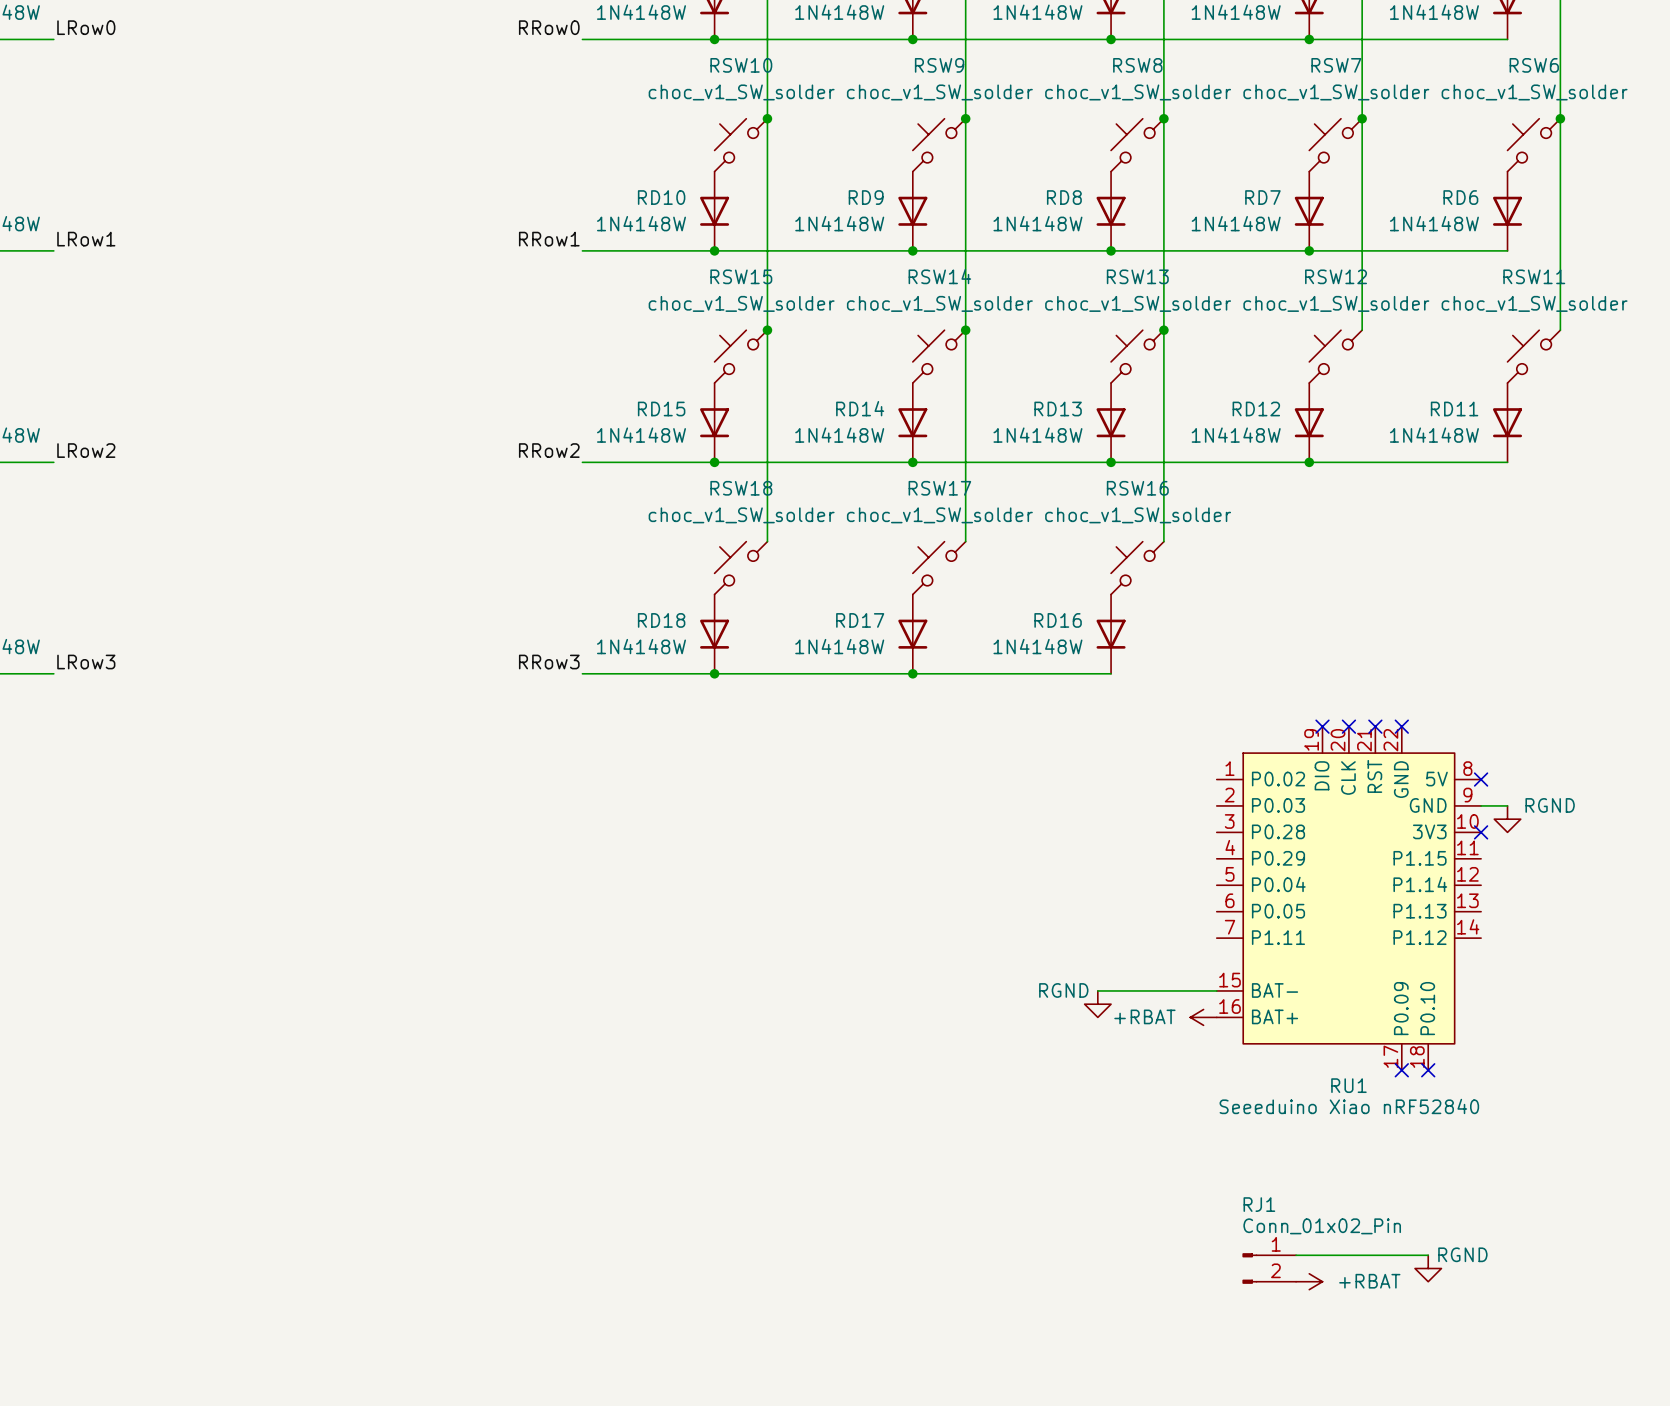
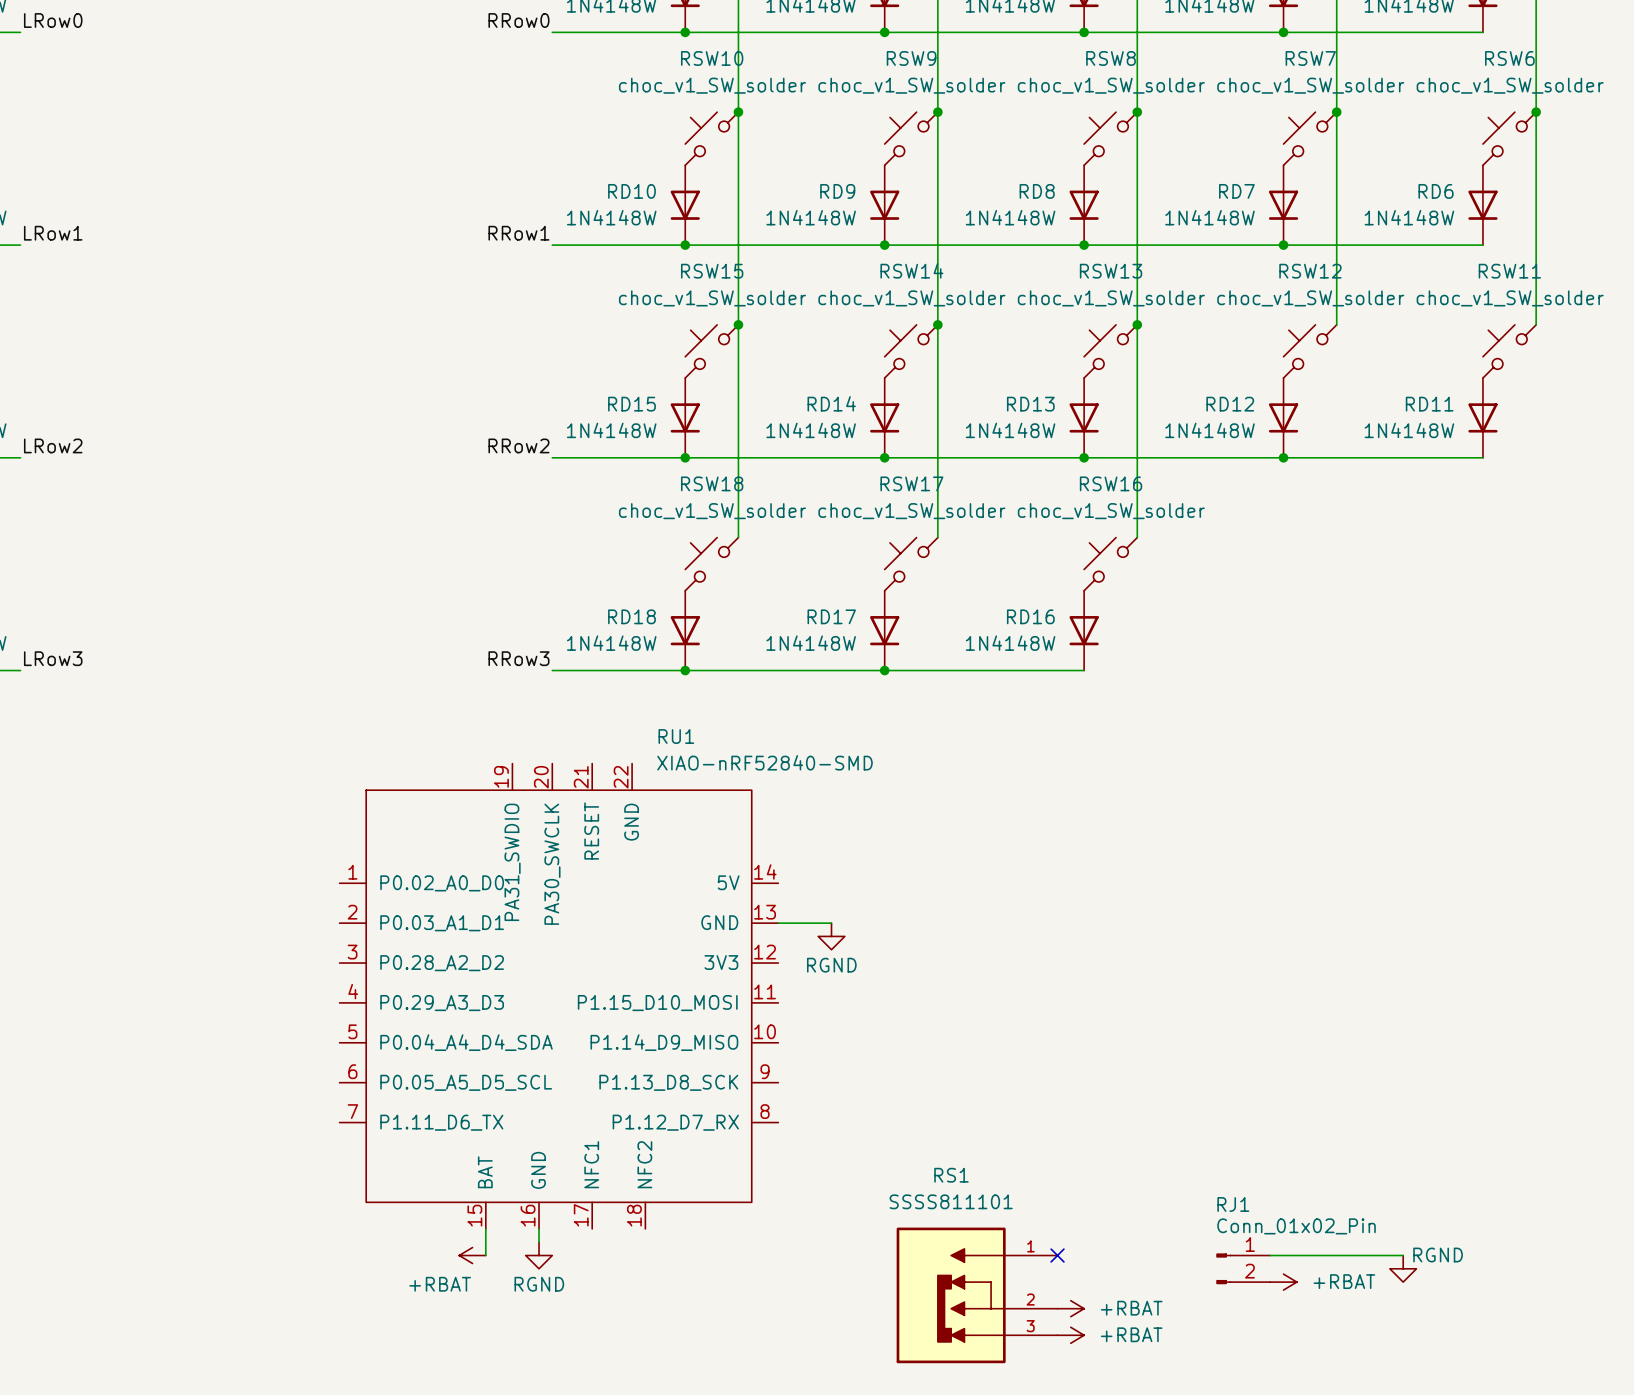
RU1 symbol: [1216, 726, 1482, 1071] -> [339, 763, 779, 1229]
no-connect mark: (1322, 726) -> none
no-connect mark: (1348, 726) -> none
no-connect mark: (1375, 726) -> none
no-connect mark: (1401, 726) -> none
no-connect mark: (1481, 779) -> none
wire: (1481, 805) (1507, 805) -> none
power symbol: RGND (1507, 819) -> none
no-connect mark: (1481, 832) -> none
wire: none -> (778, 923) (831, 923)
power symbol text position: RGND (1063, 990) -> RGND (831, 965)
wire: (1097, 990) (1216, 990) -> none
power symbol position: RGND (1097, 1004) -> RGND (831, 936)
power symbol: +RBAT (1203, 1017) -> none
no-connect mark: (1401, 1070) -> none
no-connect mark: (1428, 1070) -> none
RU1 name position: RU1 (1348, 1085) -> RU1 (676, 736)
RU1 value: Seeeduino Xiao nRF52840 (1349, 1106) -> XIAO-nRF52840-SMD (764, 762)
wire: none -> (485, 1228) (485, 1255)
wire: none -> (539, 1228) (539, 1242)
power symbol: none -> +RBAT (472, 1255)
power symbol: none -> RGND (539, 1255)
no-connect mark: none -> (1057, 1255)
RS1: none -> SSSS811101 (977, 1295)
power symbol: none -> +RBAT (1070, 1308)
power symbol: none -> +RBAT (1070, 1335)

